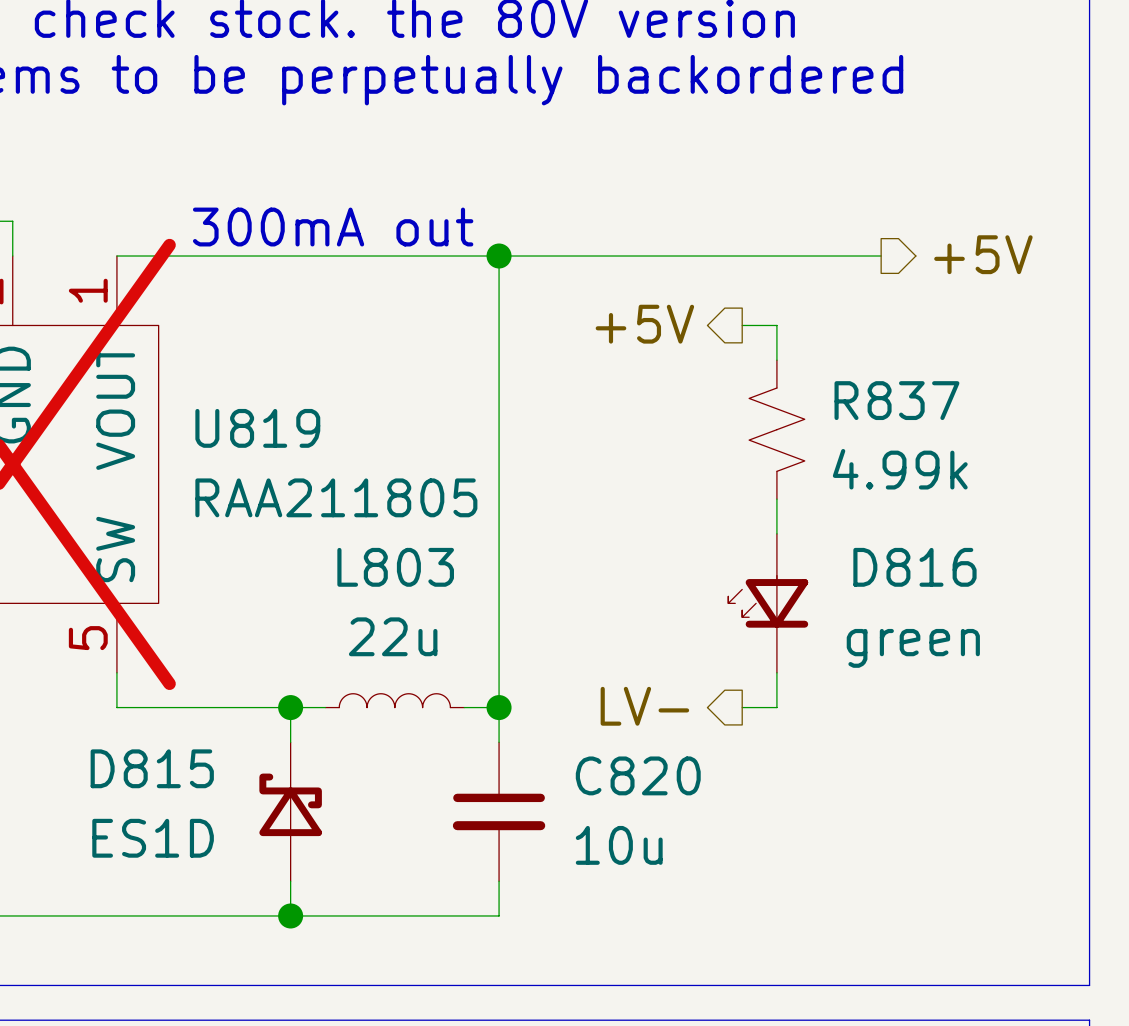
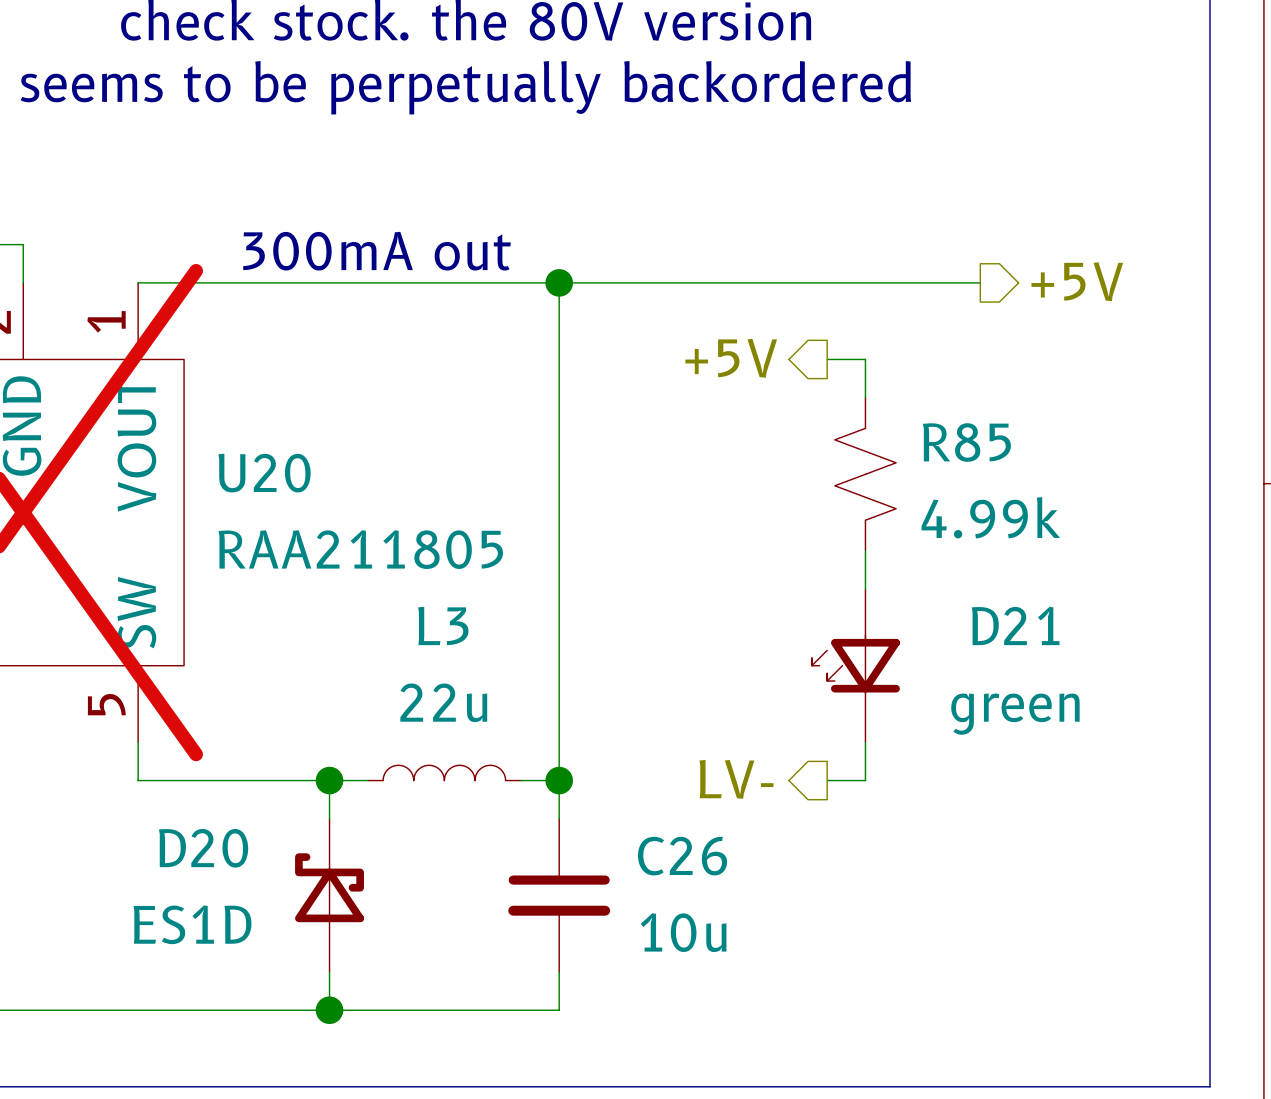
R837 name: R837 (896, 400) -> R85 (966, 442)
U819 name: U819 (257, 428) -> U20 (264, 473)
L803 name: L803 (395, 567) -> L3 (443, 626)
D816 name: D816 (914, 567) -> D21 (1015, 626)
D815 name: D815 (152, 768) -> D20 (203, 848)
C820 name: C820 (638, 775) -> C26 (682, 856)

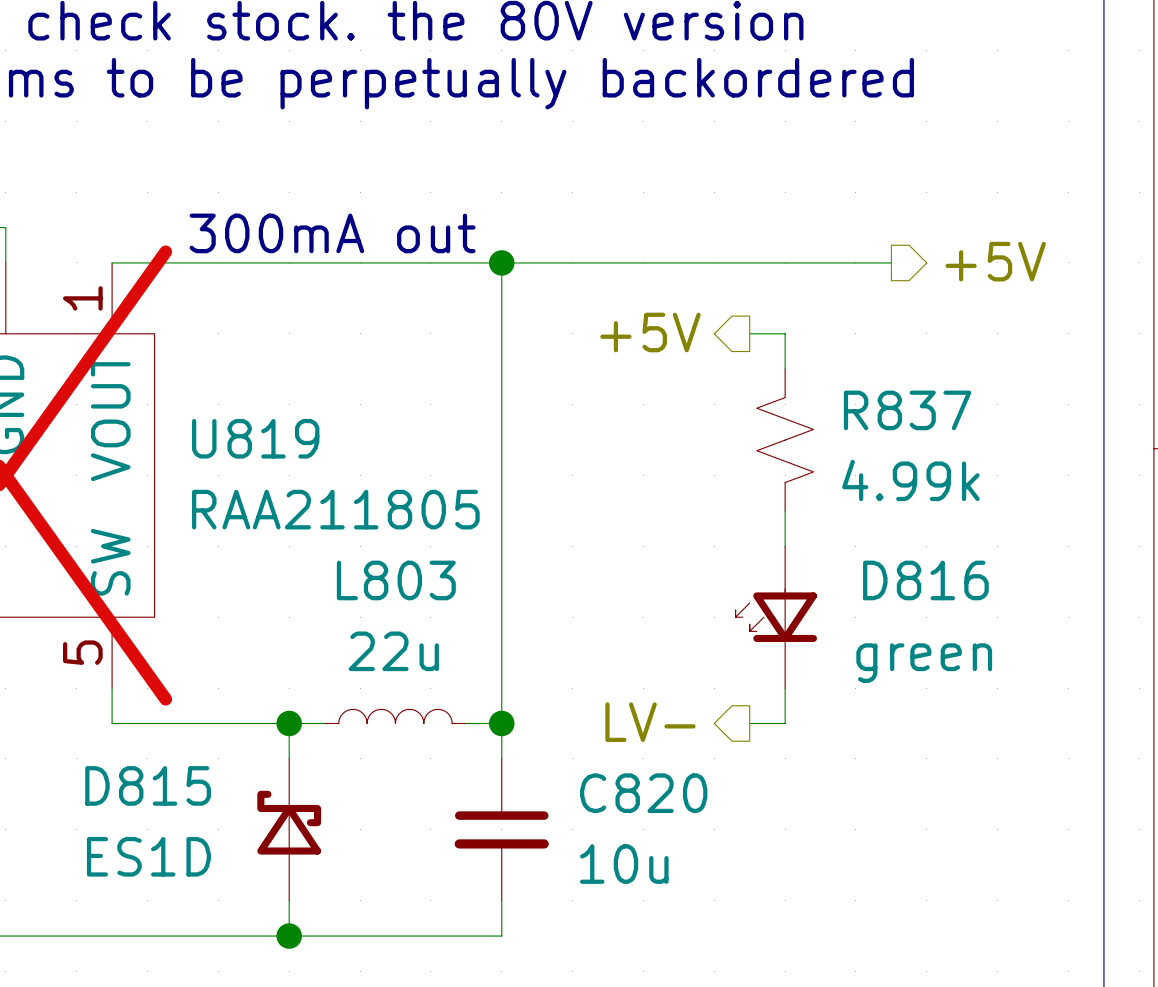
R85 name: R85 (966, 442) -> R837 (907, 410)
U20 name: U20 (264, 473) -> U819 (255, 438)
L3 name: L3 (443, 626) -> L803 (396, 580)
D21 name: D21 (1015, 626) -> D816 (925, 580)
D20 name: D20 (203, 848) -> D815 (148, 785)
C26 name: C26 (682, 856) -> C820 (643, 793)

